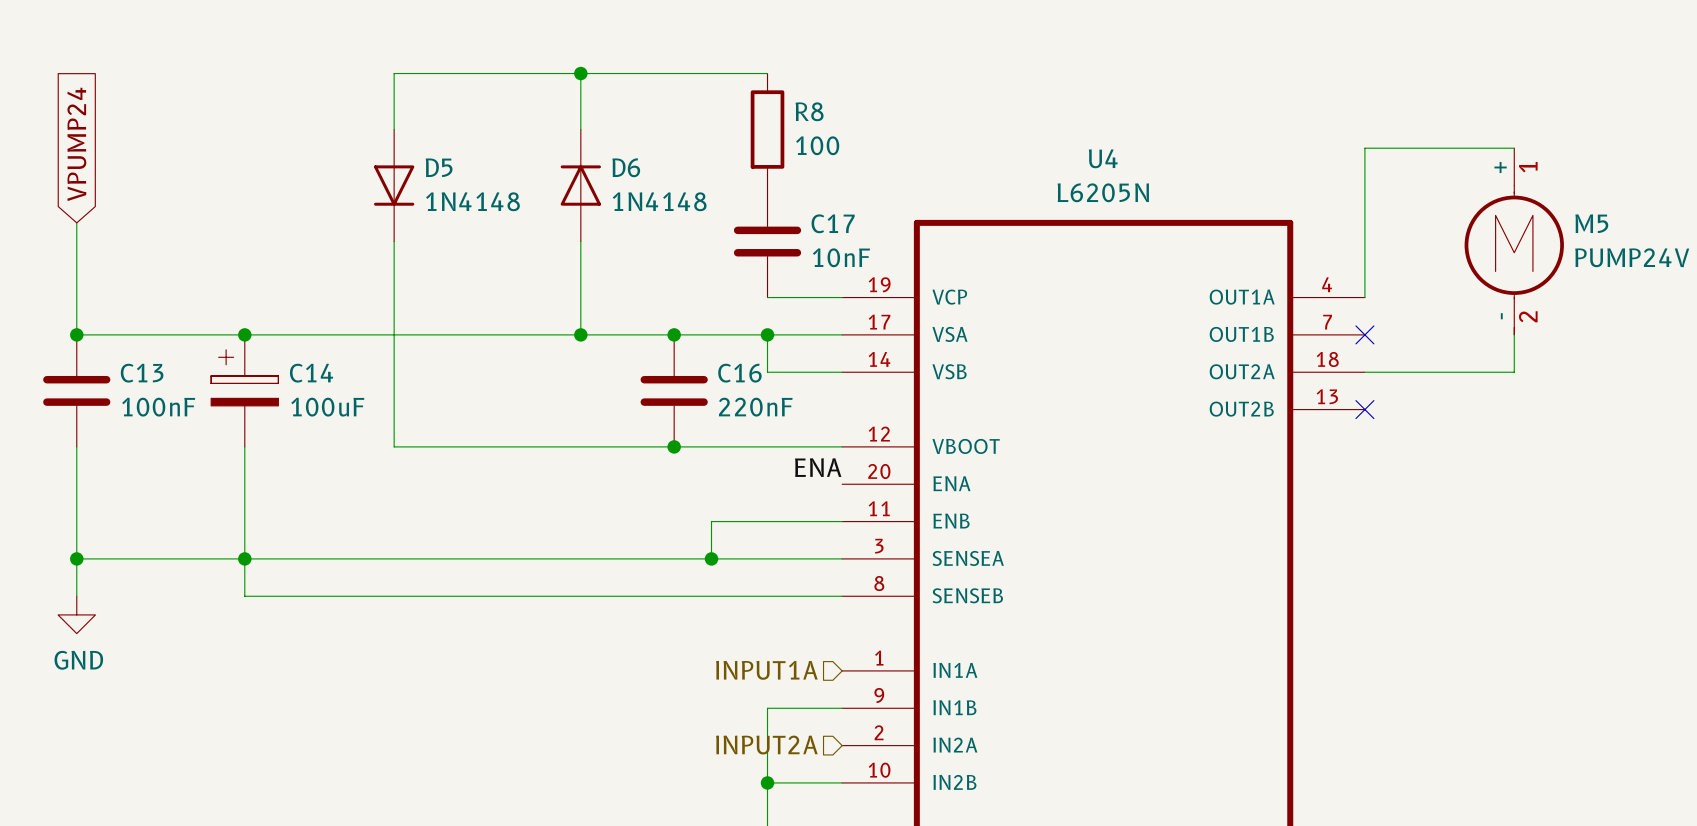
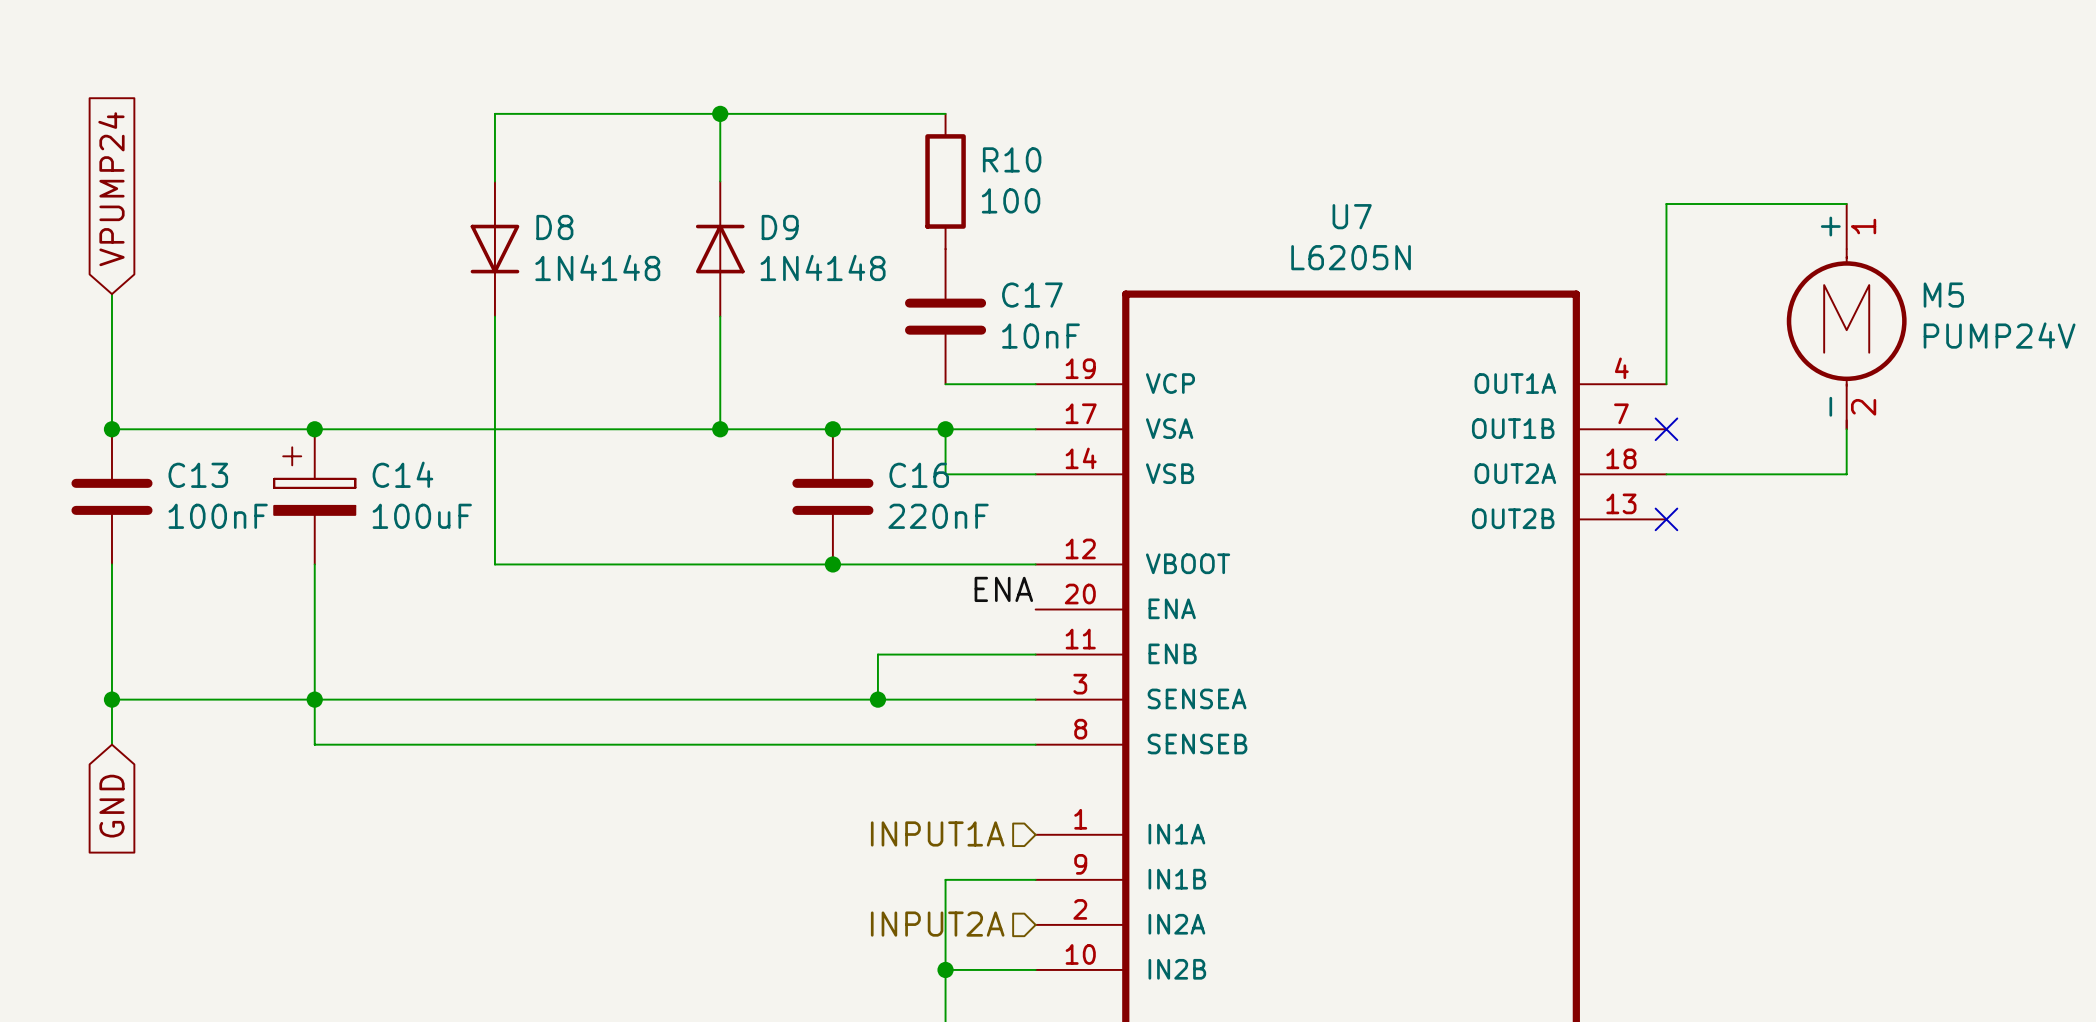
R8 name: R8 (809, 111) -> R10 (1012, 159)
U4 name: U4 (1103, 158) -> U7 (1352, 216)
D5 name: D5 (439, 167) -> D8 (554, 227)
D6 name: D6 (626, 167) -> D9 (780, 227)
power symbol: GND (76, 614) -> none
global label: none -> GND (111, 806)

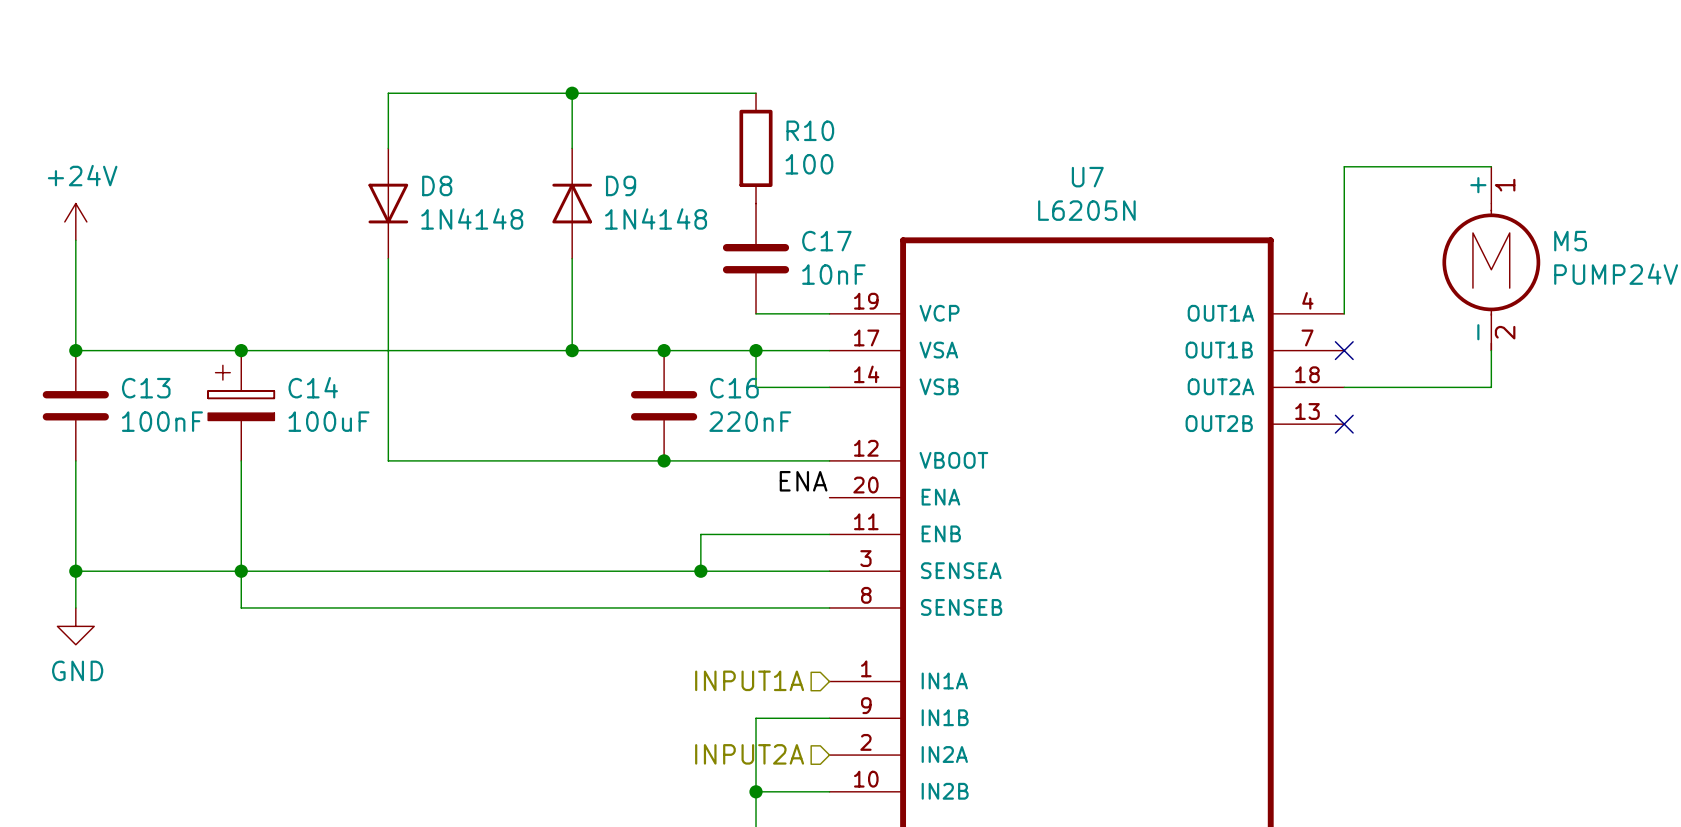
global label: VPUMP24 (111, 189) -> none
power symbol: none -> +24V (75, 221)
power symbol: none -> GND (75, 626)
global label: GND (111, 806) -> none

